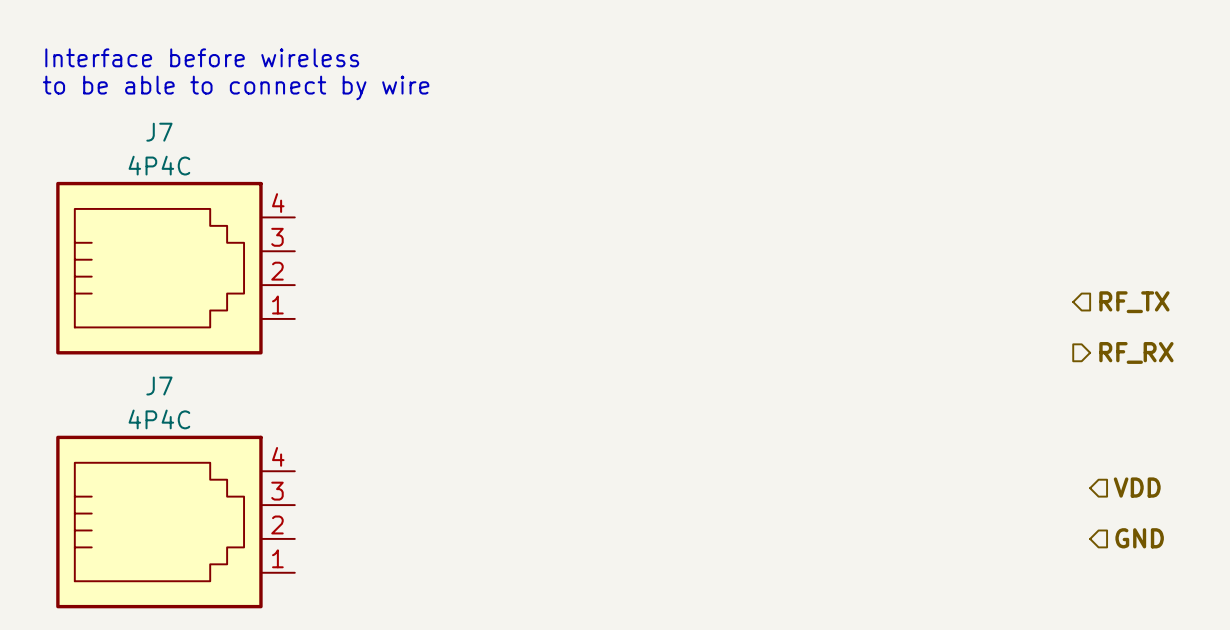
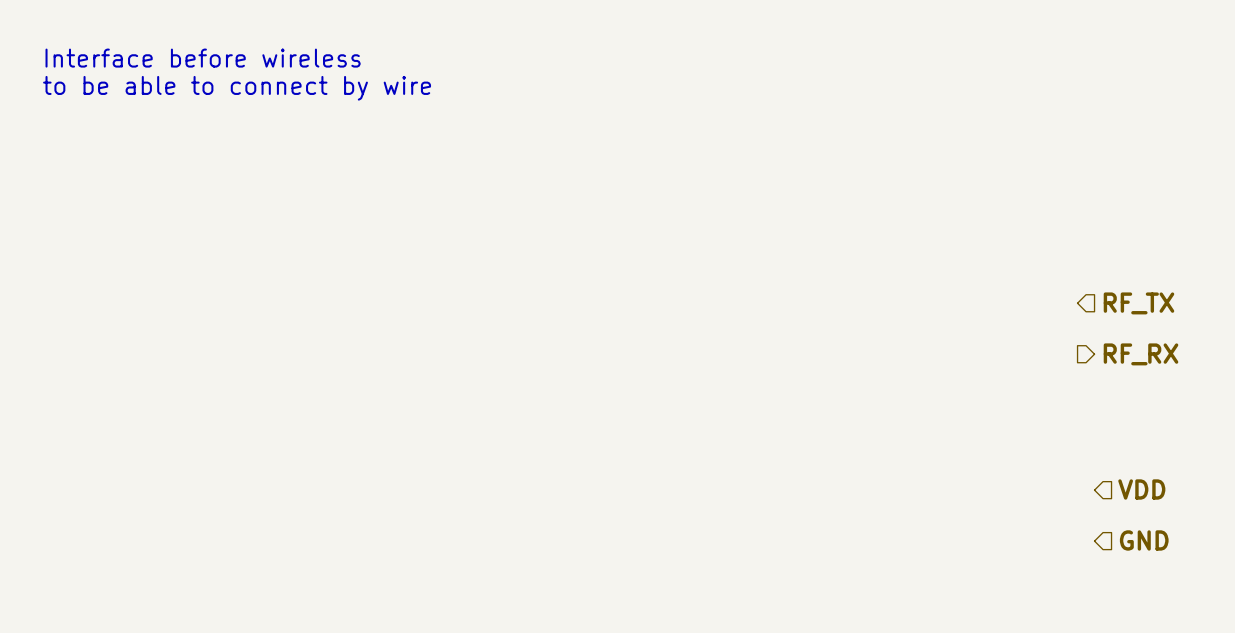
J7: 4P4C (175, 268) -> none
J7: 4P4C (175, 522) -> none

